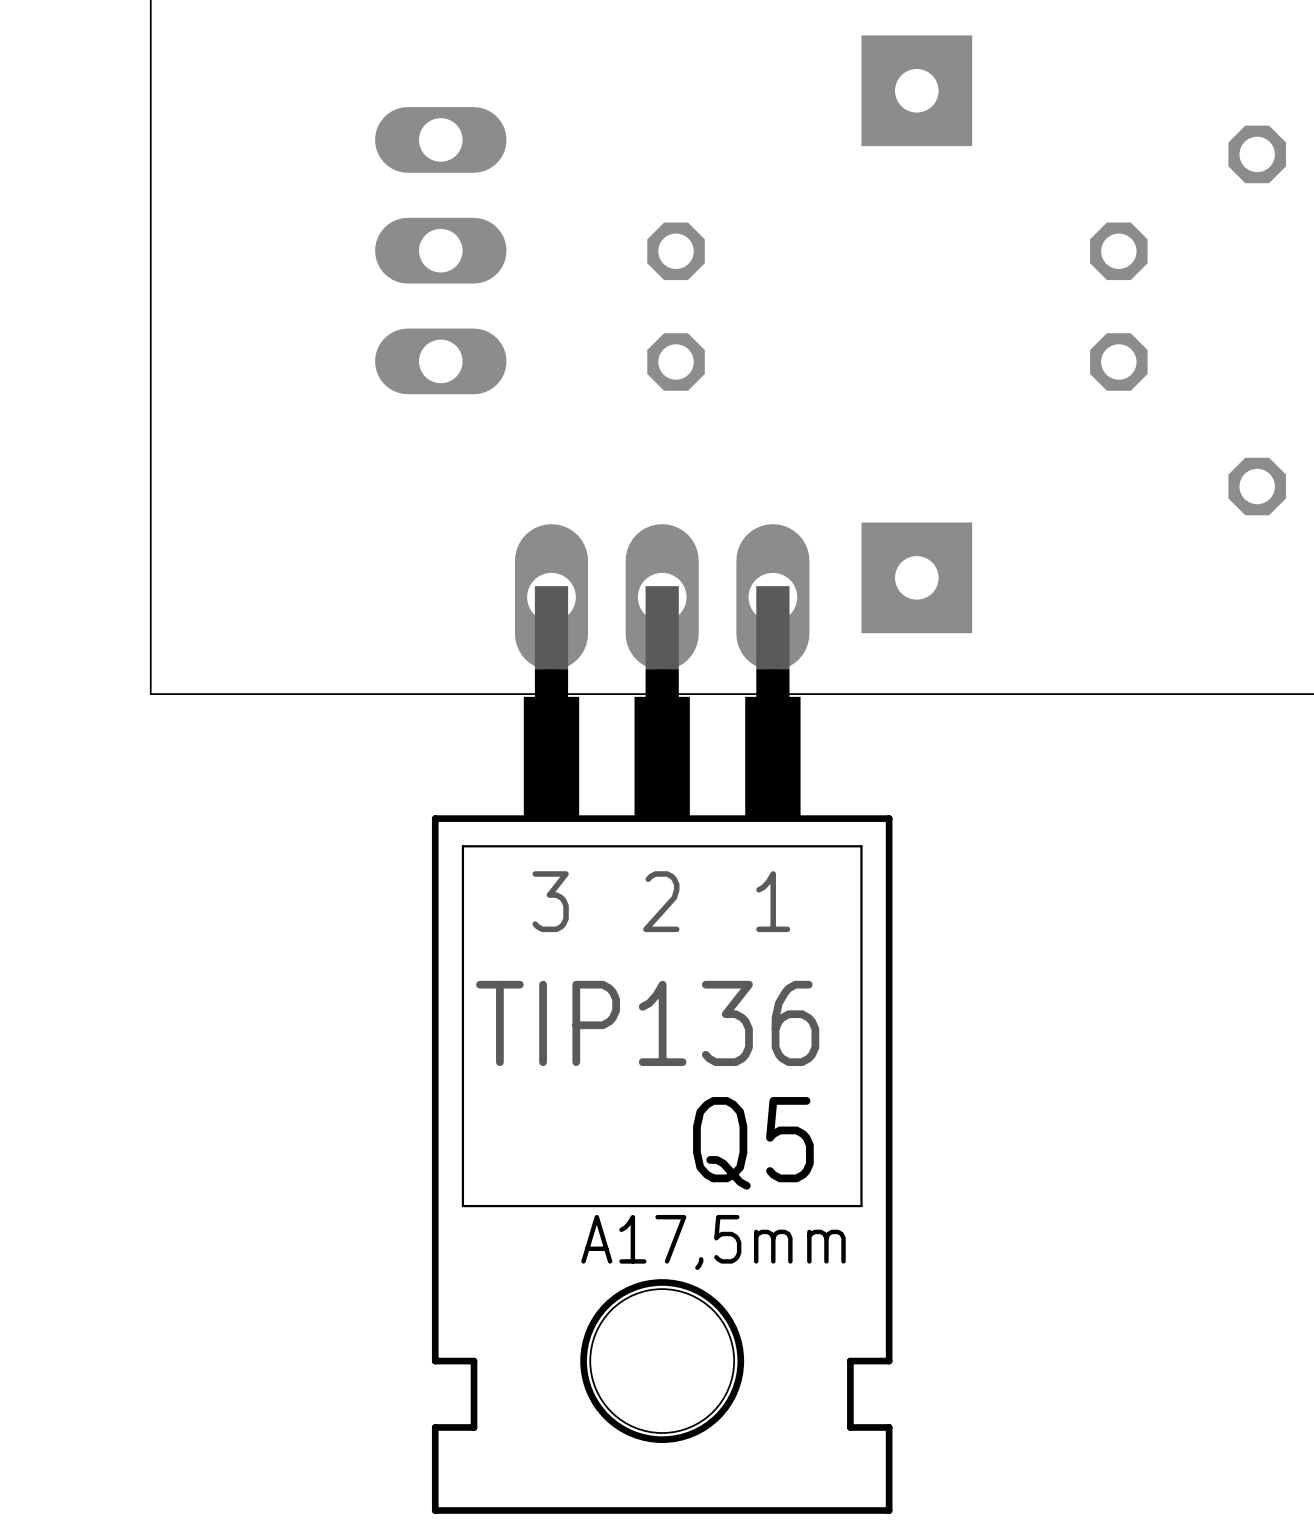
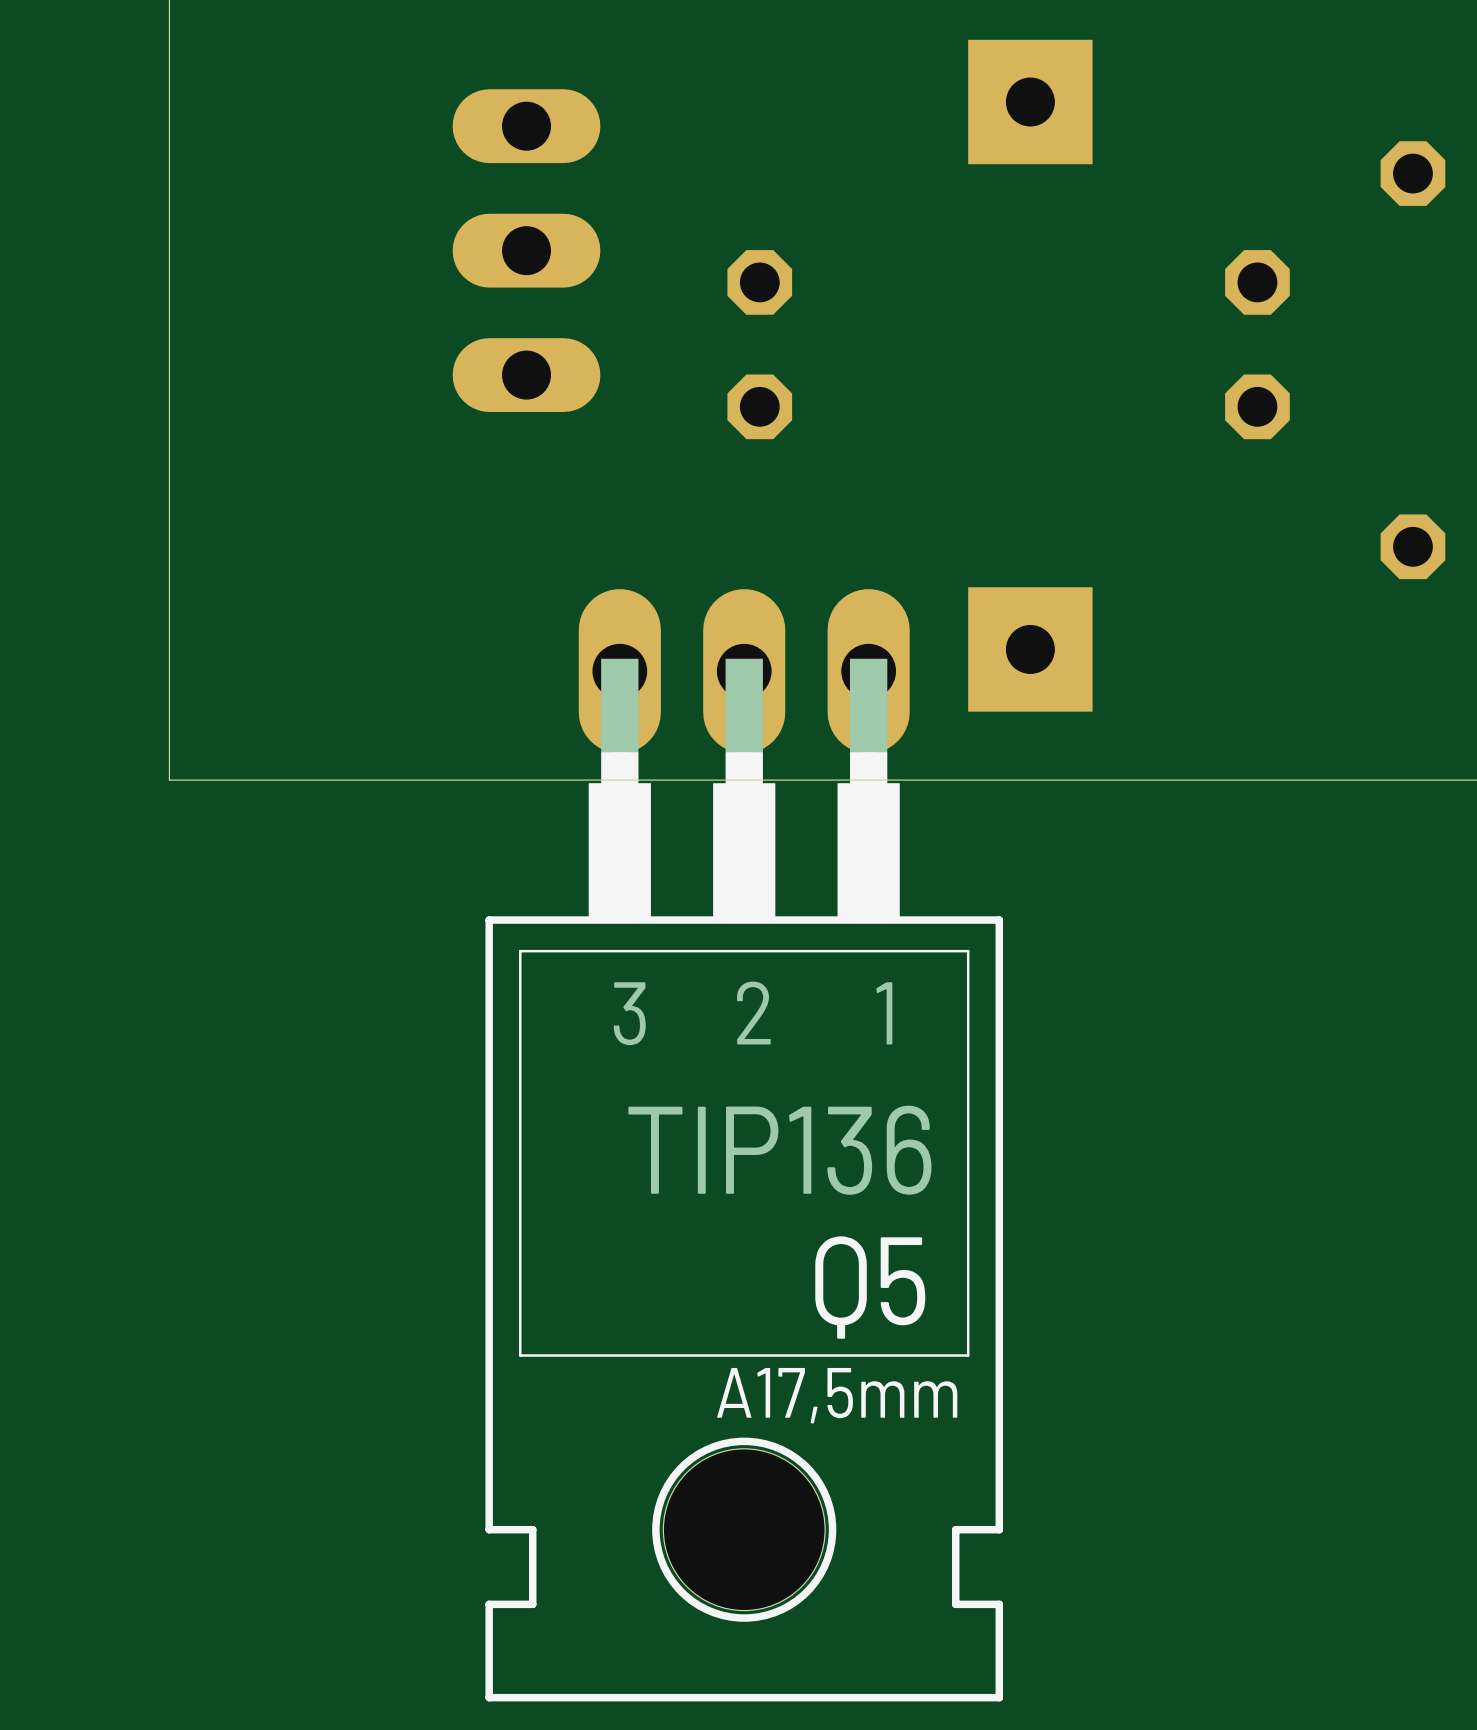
part position: (440, 250) -> (526, 250)

